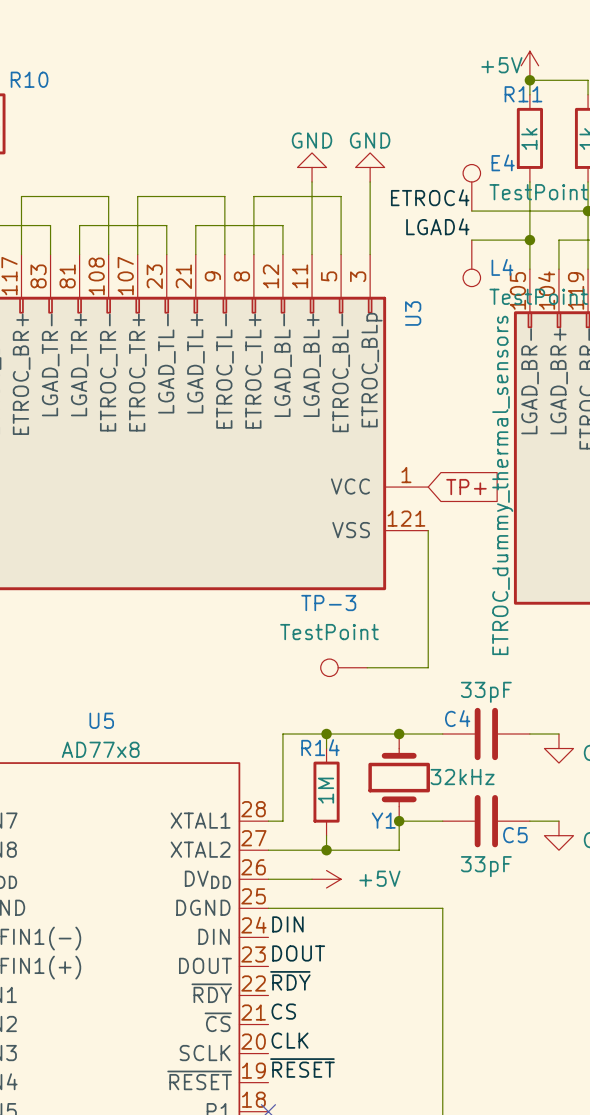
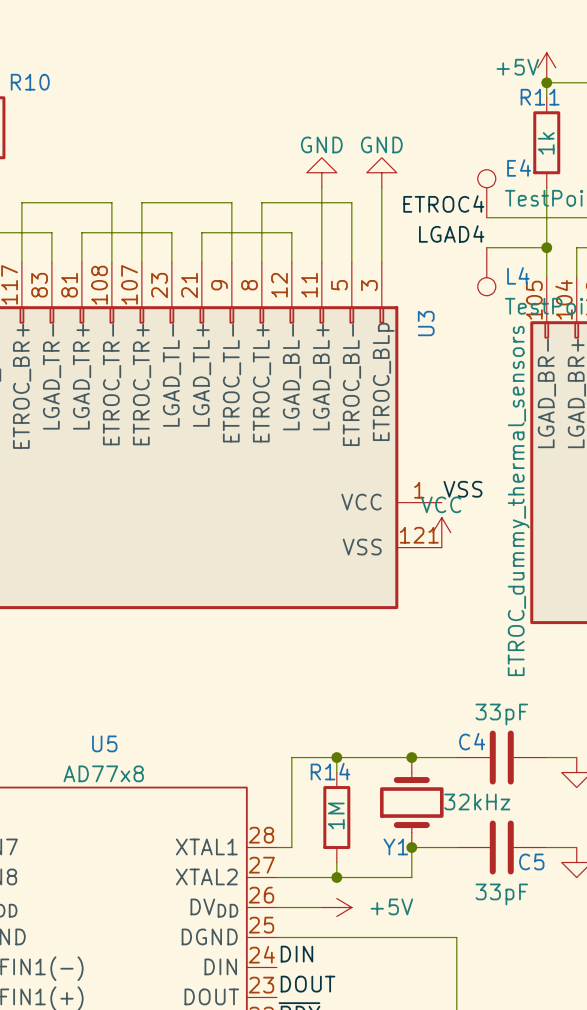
label: none -> VSS (462, 489)
global label: TP+ (466, 487) -> none
power symbol: none -> VCC (441, 532)
wire: (428, 530) (428, 667) (367, 667) -> none
TP-3: TestPoint (343, 667) -> none

